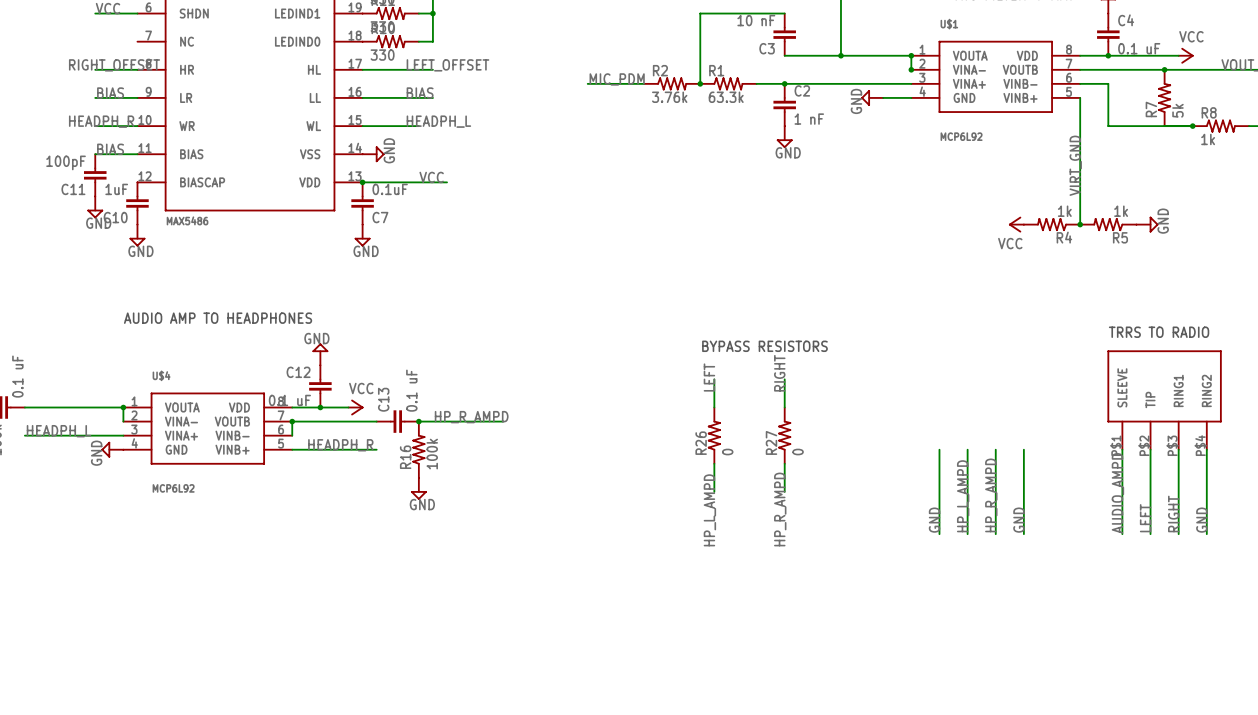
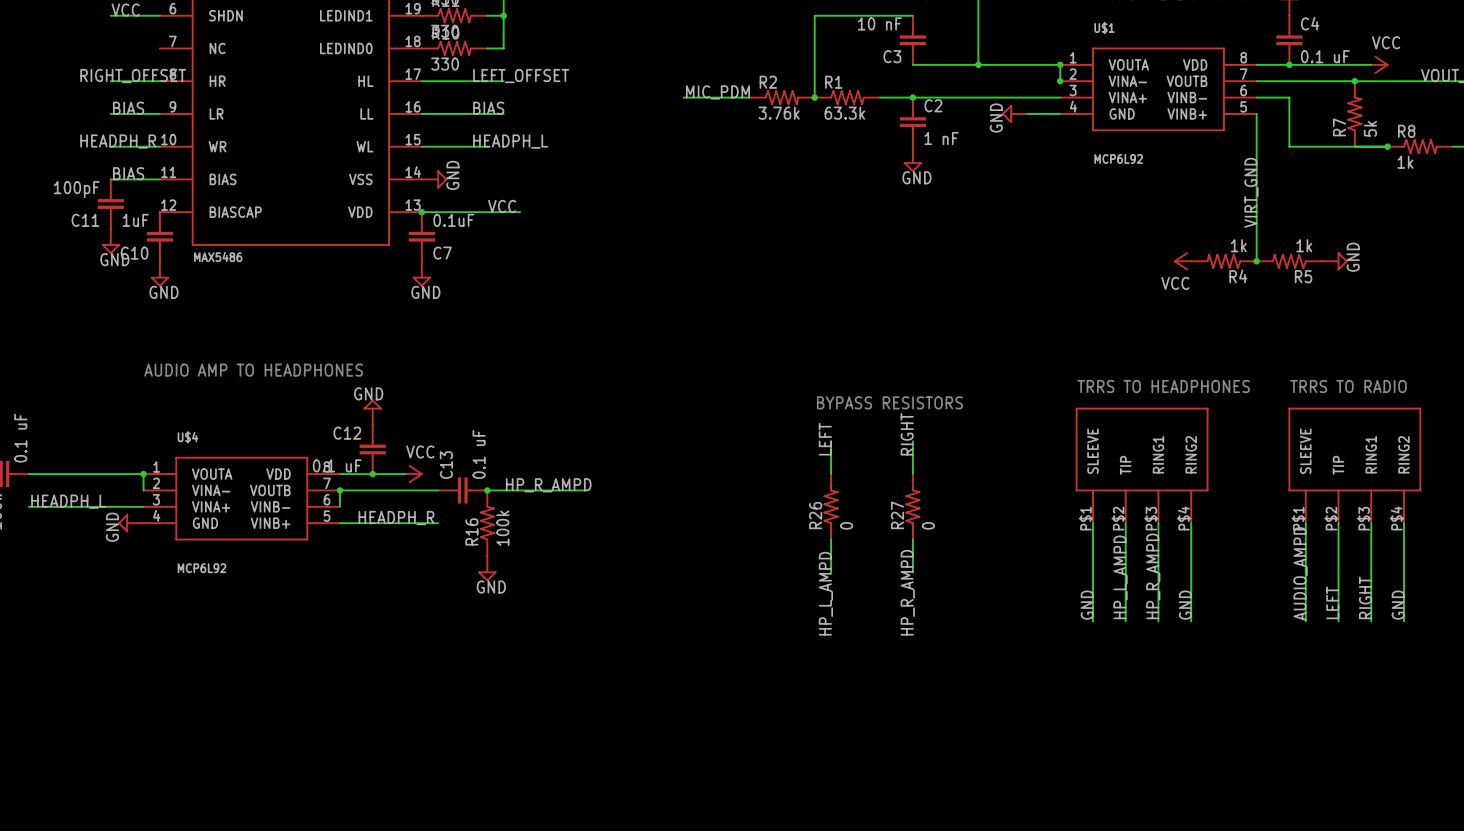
text: none -> TRRS TO HEADPHONES (1163, 386)
part: none -> (1142, 465)

